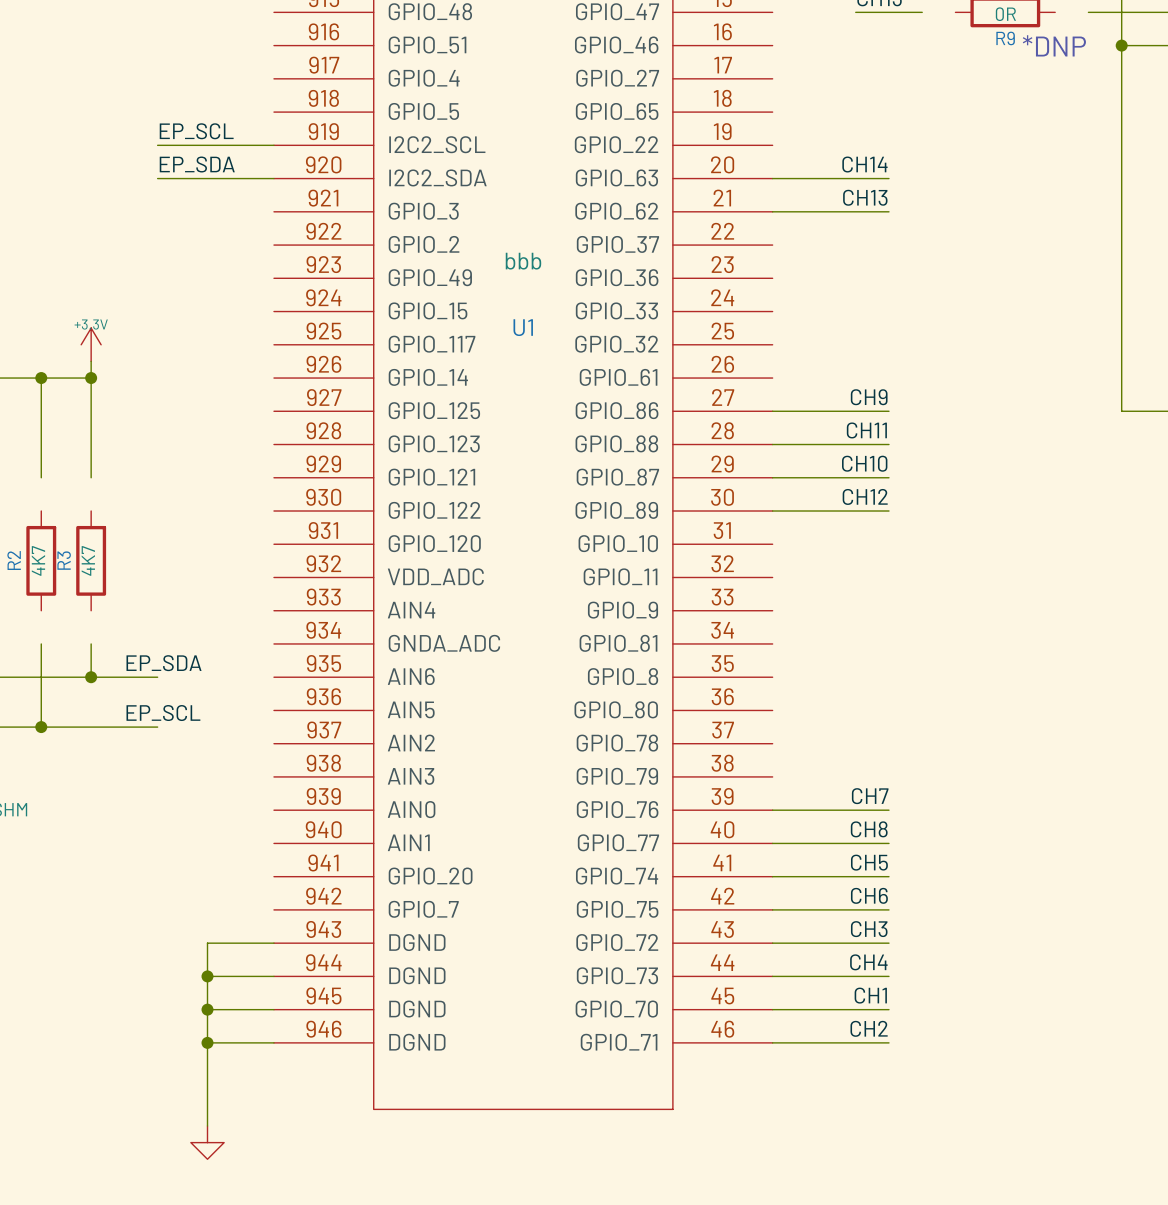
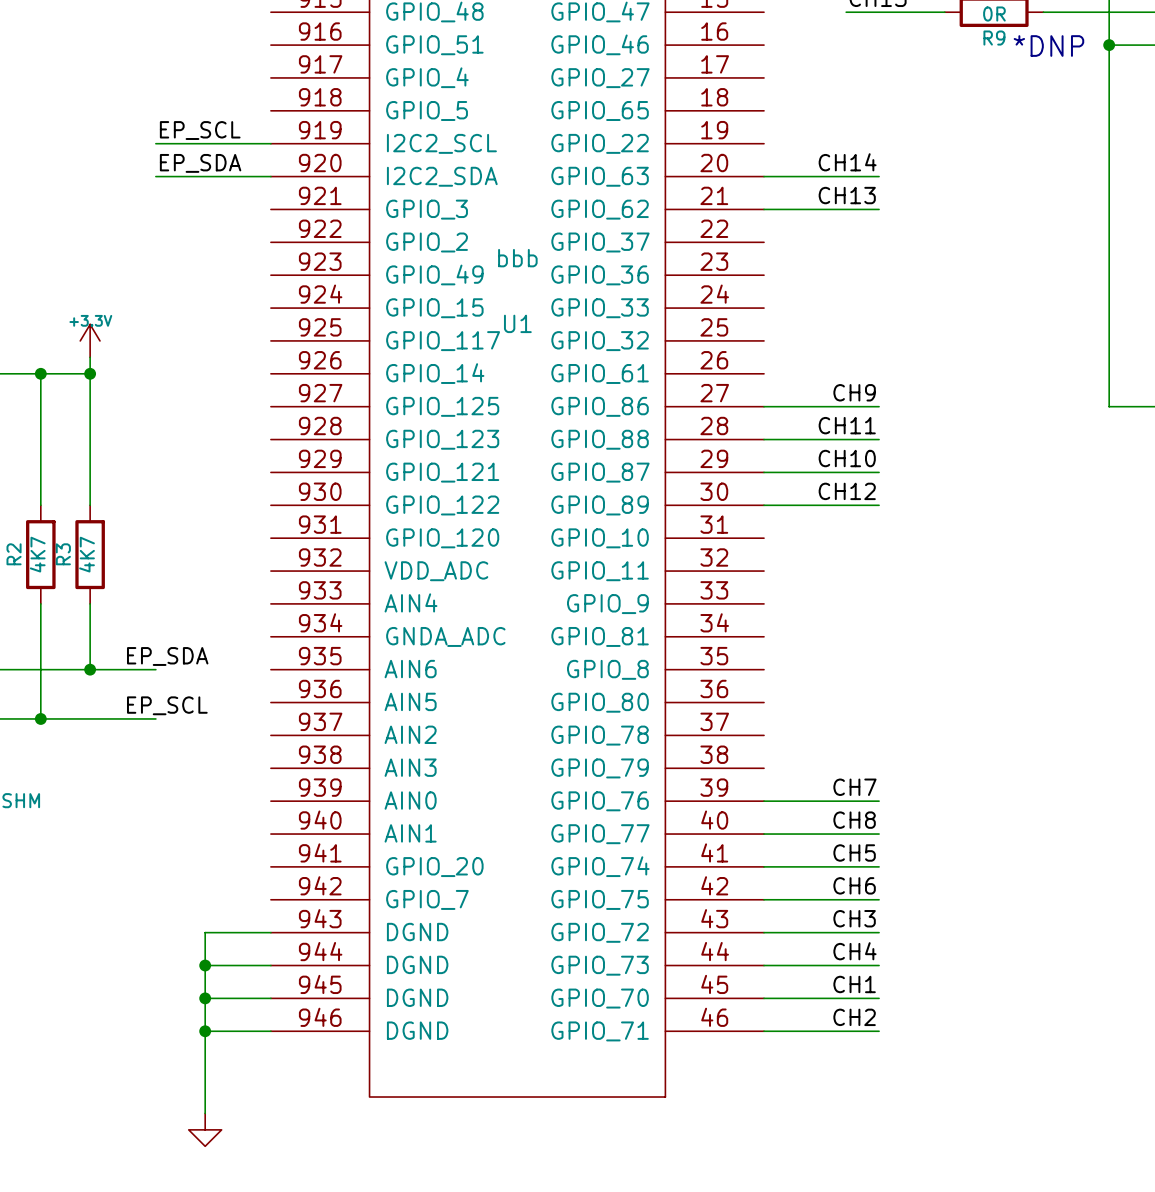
wire: none -> (911, 12) (944, 12)
wire: none -> (1043, 12) (1076, 12)
wire: none -> (40, 472) (40, 505)
wire: none -> (90, 472) (90, 505)
wire: none -> (40, 603) (40, 636)
wire: none -> (90, 603) (90, 636)

